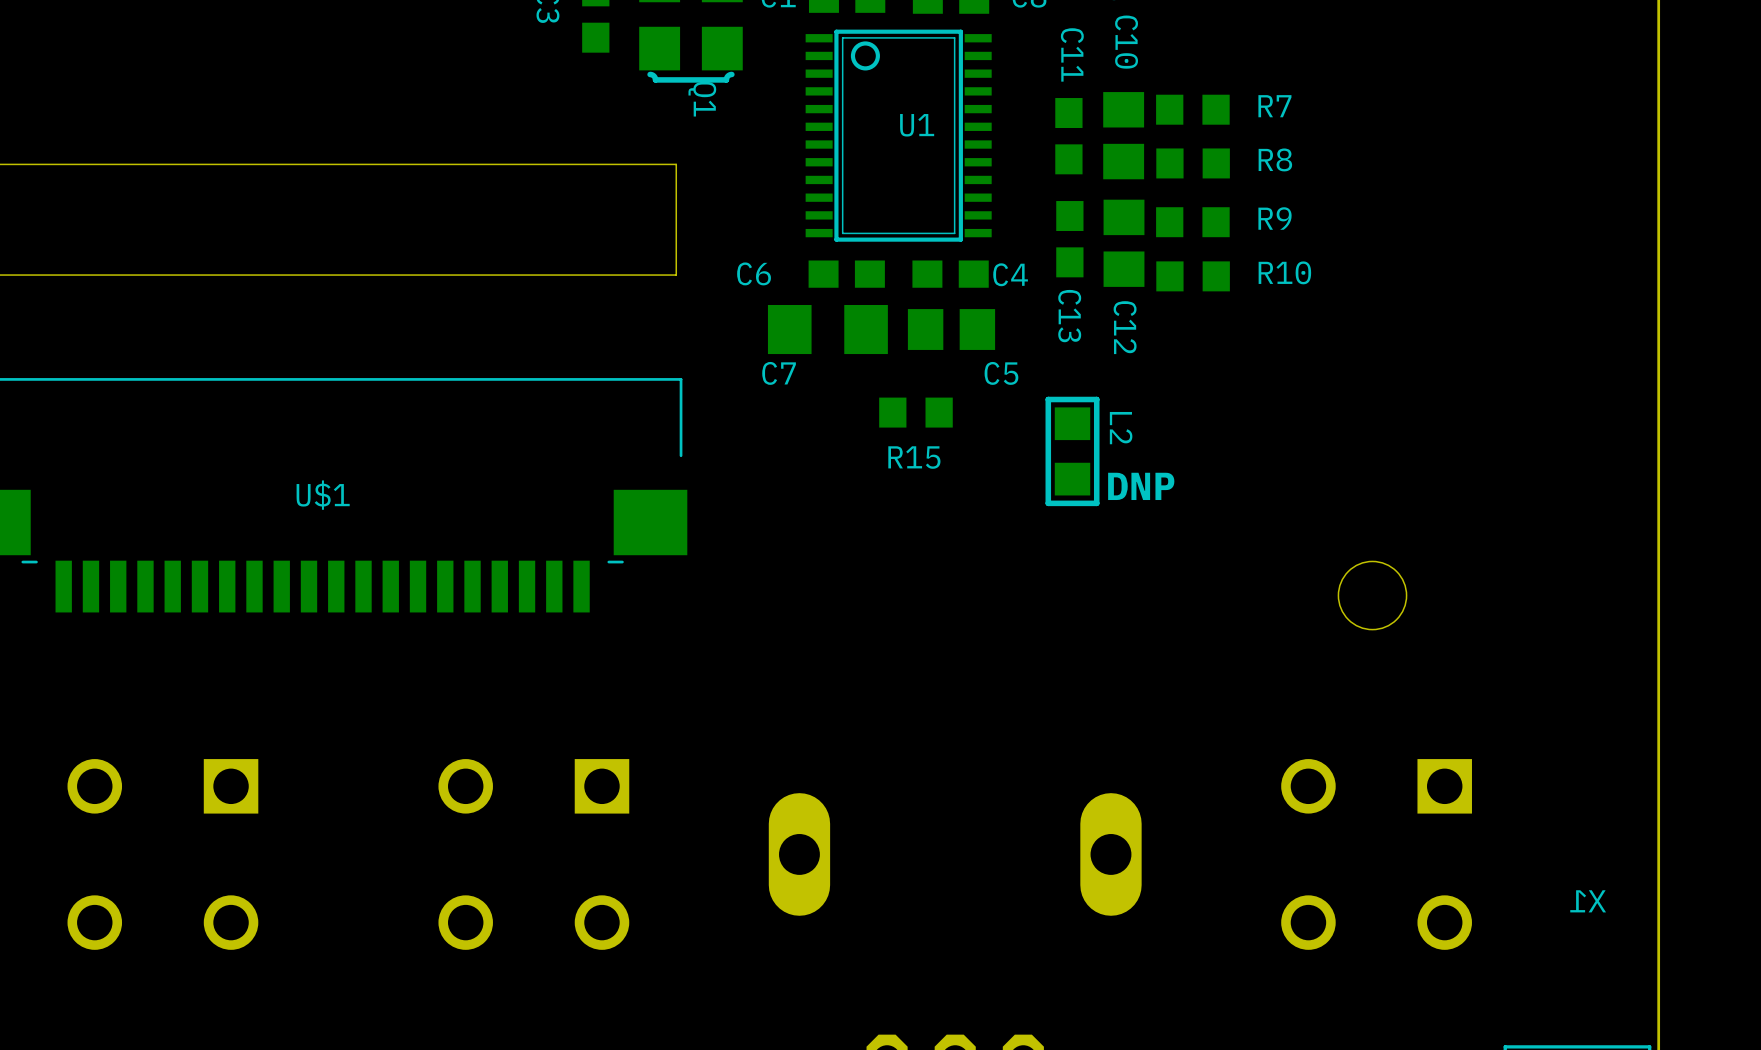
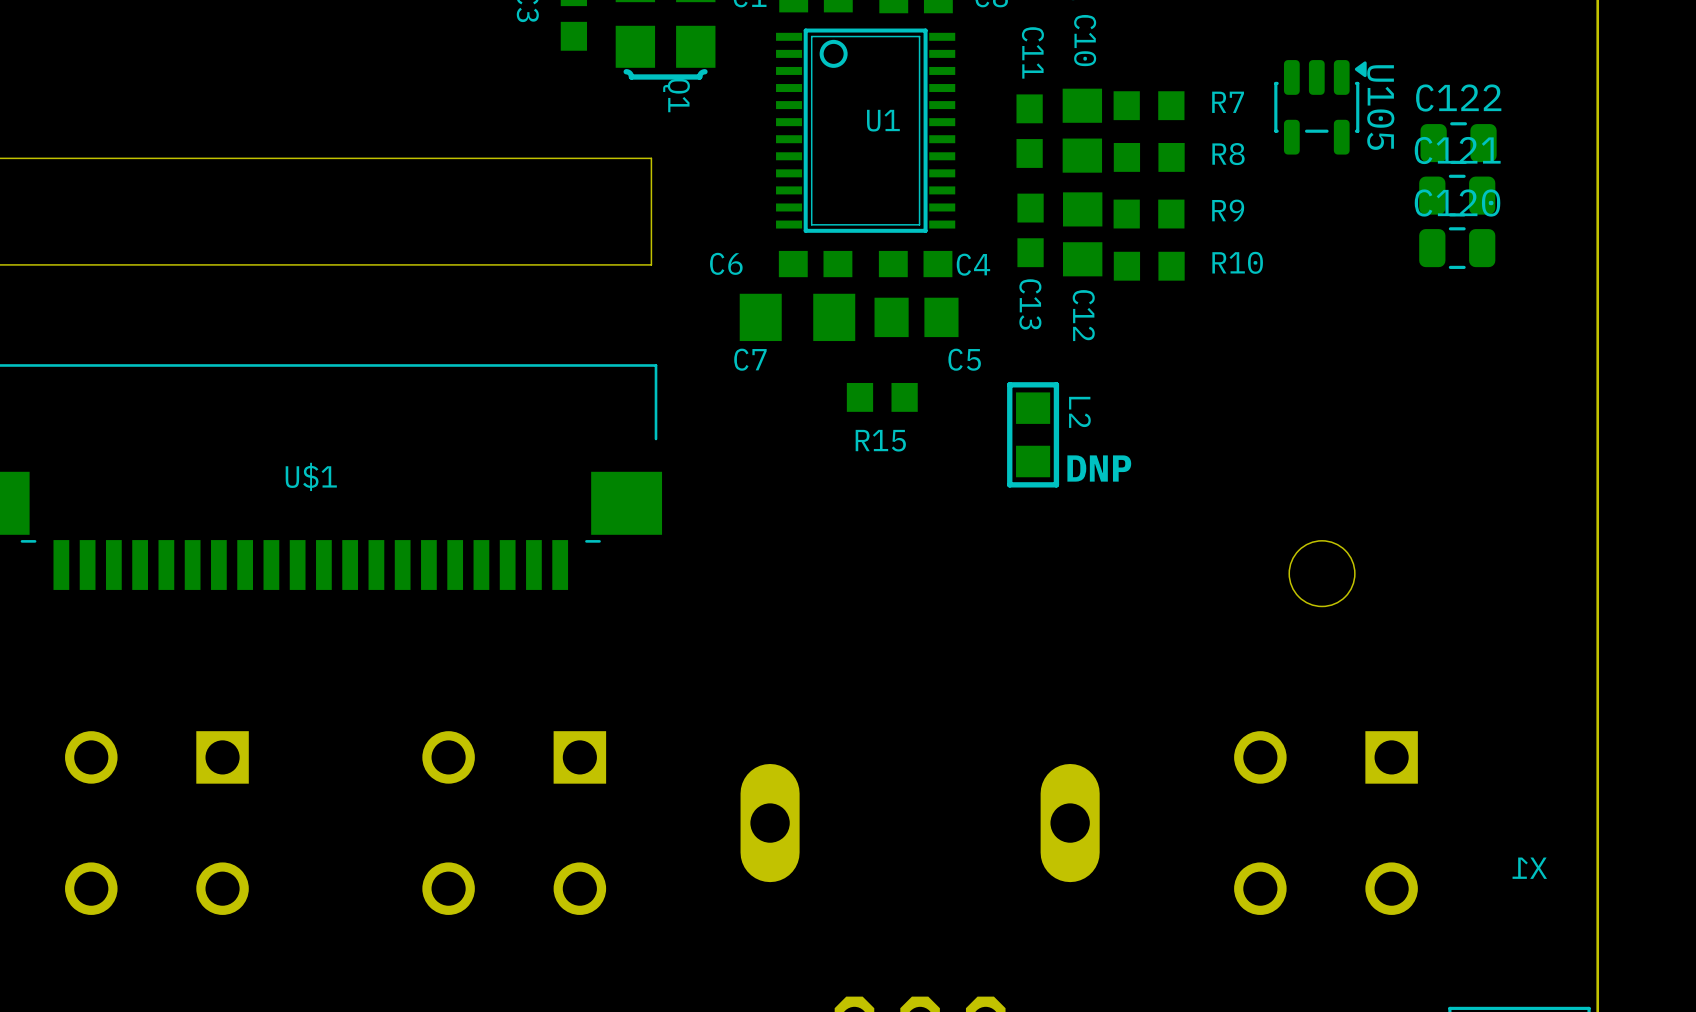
U105: none -> (1320, 107)
C122: none -> (1458, 143)
C121: none -> (1457, 195)
C120: none -> (1457, 248)

